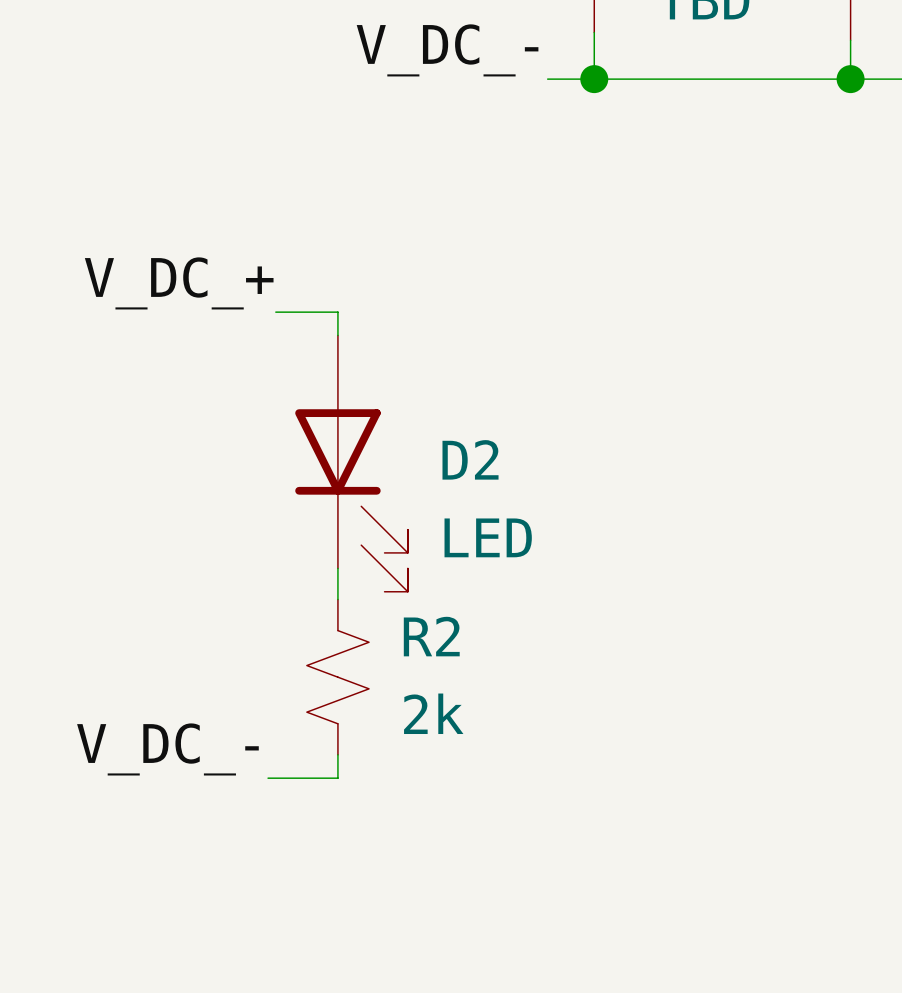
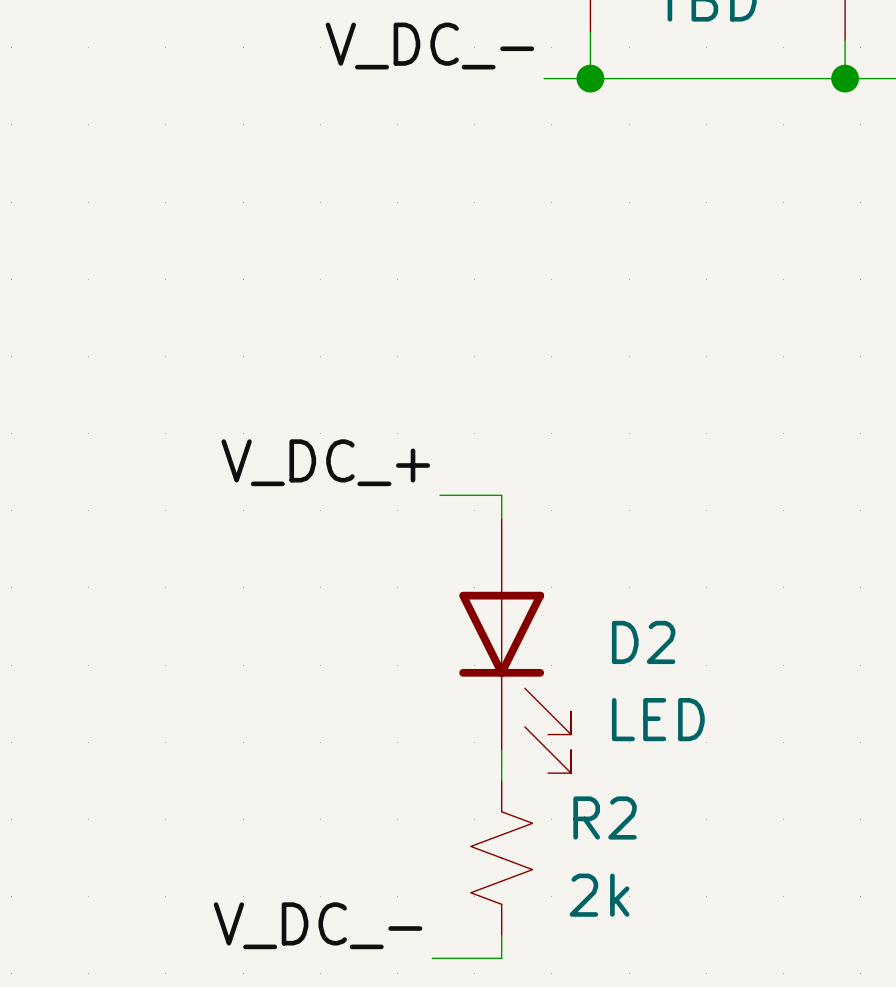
label: V_DC_+ (179, 283) -> none
wire: (275, 312) (337, 312) (337, 335) -> (439, 495) (501, 495) (501, 518)
D2 position: (351, 463) -> (515, 645)
label: none -> V_DC_+ (325, 462)
wire: (337, 568) (337, 599) -> (501, 749) (501, 780)
R2 position: (337, 677) -> (501, 858)
label position: V_DC_- (167, 749) -> V_DC_- (318, 925)
wire: (337, 754) (337, 778) (268, 778) -> (501, 935) (501, 958) (432, 958)

